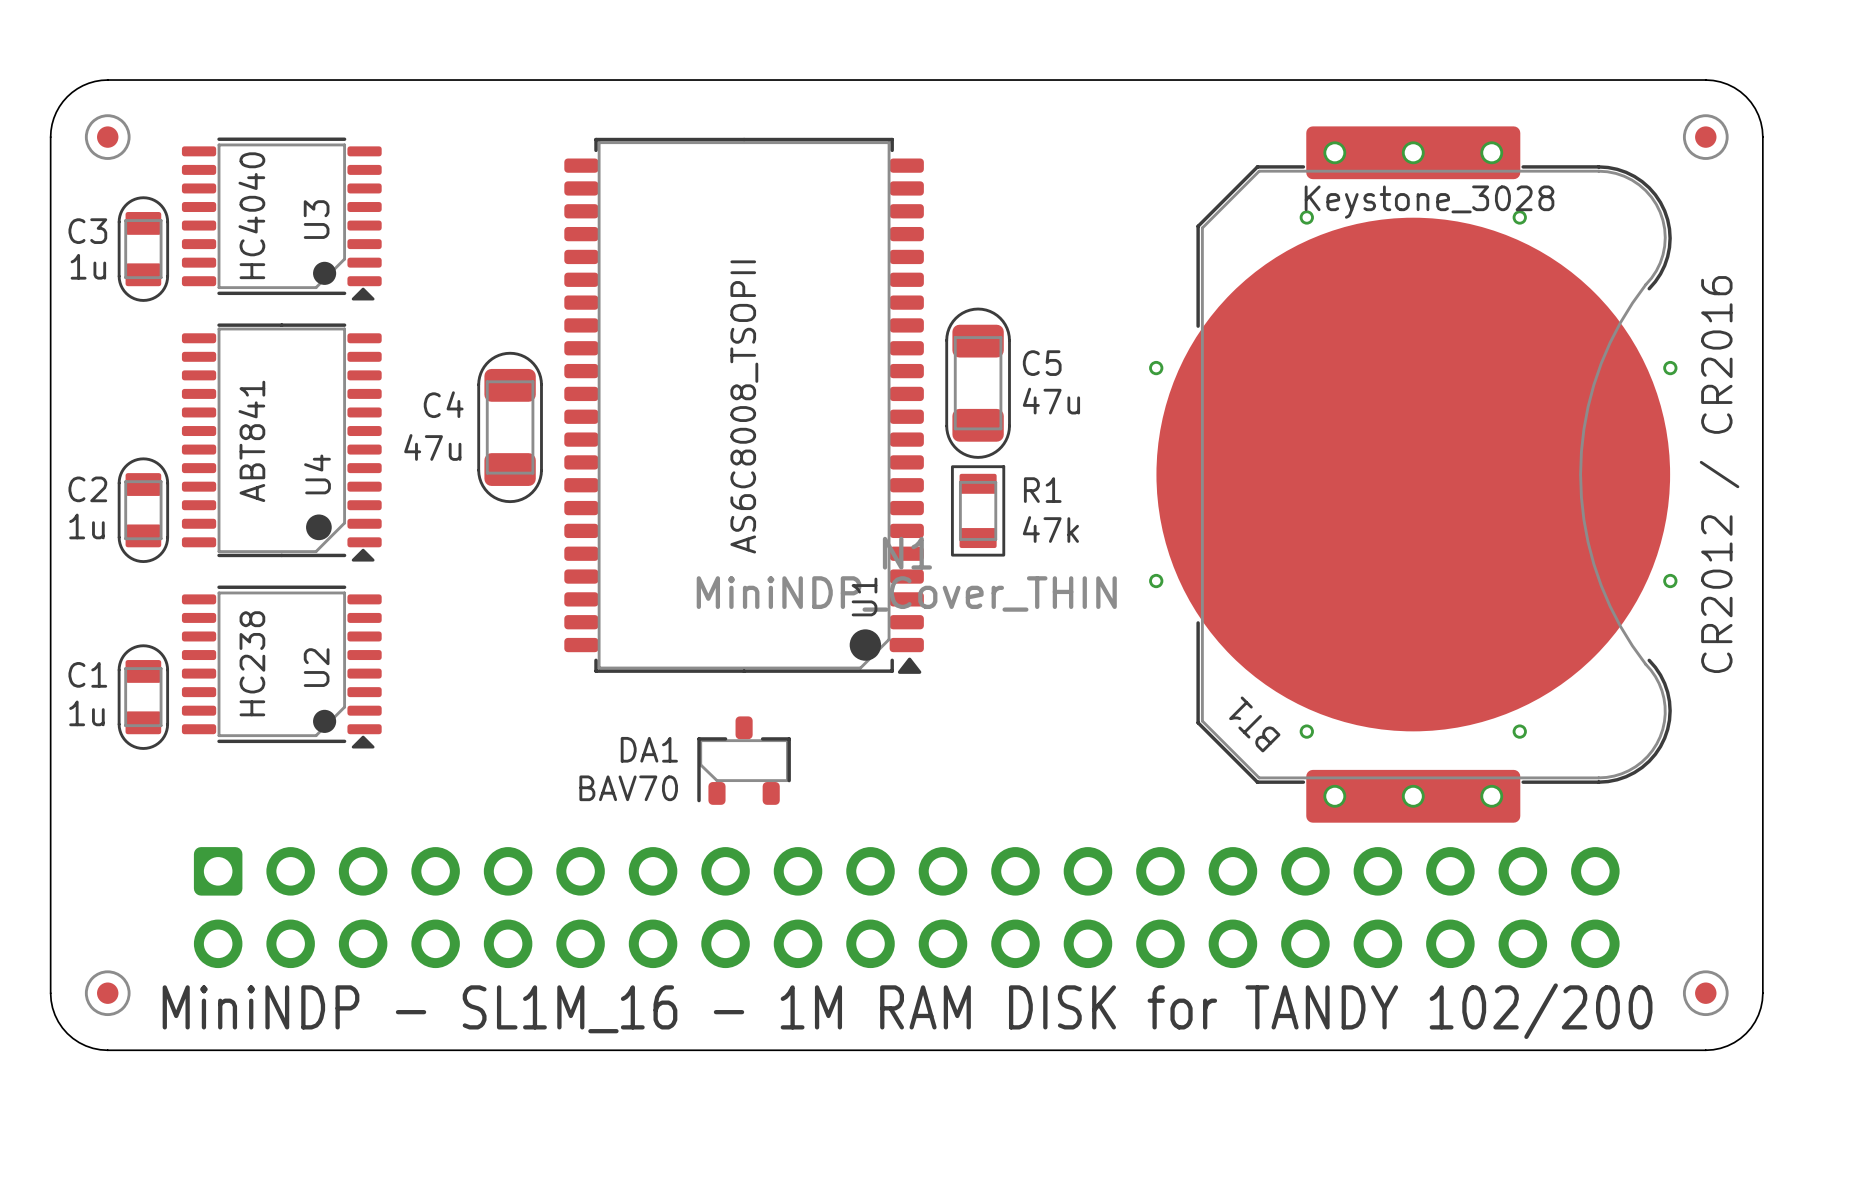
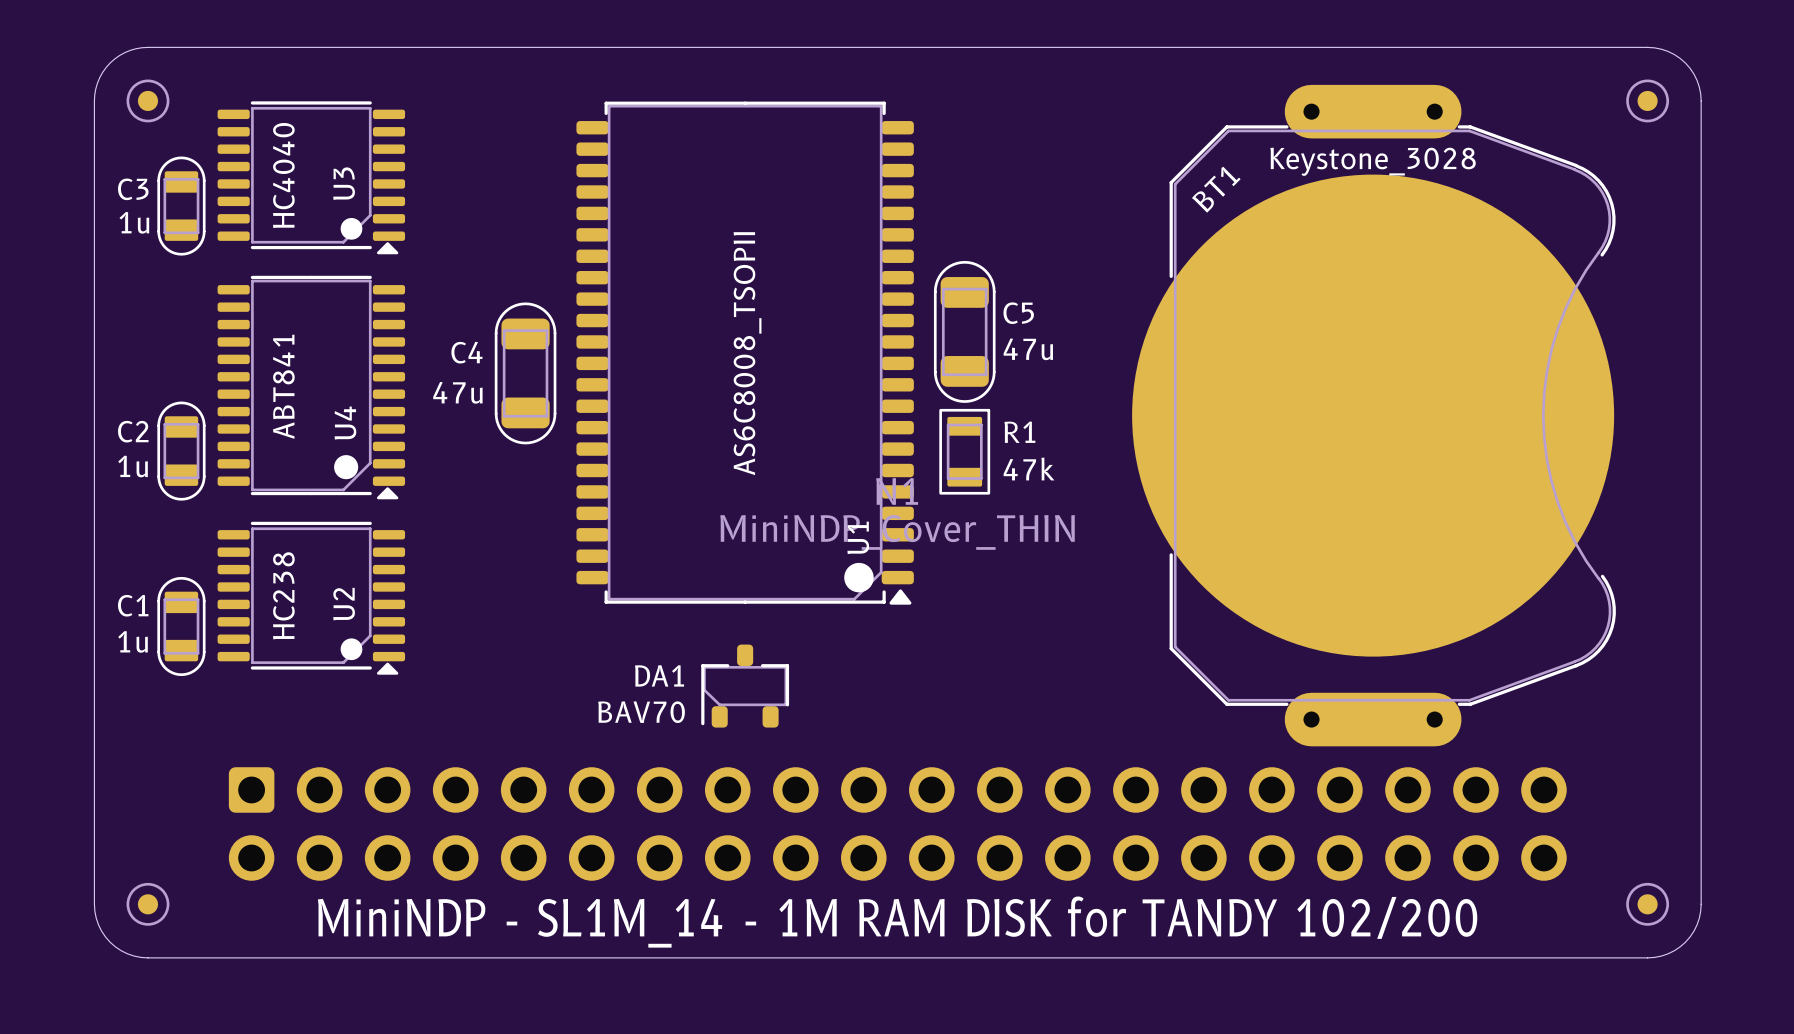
BT1 footprint: [1149, 126, 1678, 823] -> [1132, 84, 1616, 747]
part: none -> (1311, 111)
part: none -> (1434, 111)
text: CR2012 / CR2016 (1719, 474) -> none
BT1 name position: BT1 (1254, 724) -> BT1 (1216, 189)
part: none -> (1311, 719)
part: none -> (1434, 719)
text: MiniNDP - SL1M_16 - 1M RAM DISK for TANDY 102/200 (907, 1011) -> MiniNDP - SL1M_14 - 1M RAM DISK for TANDY 102/200 (897, 922)

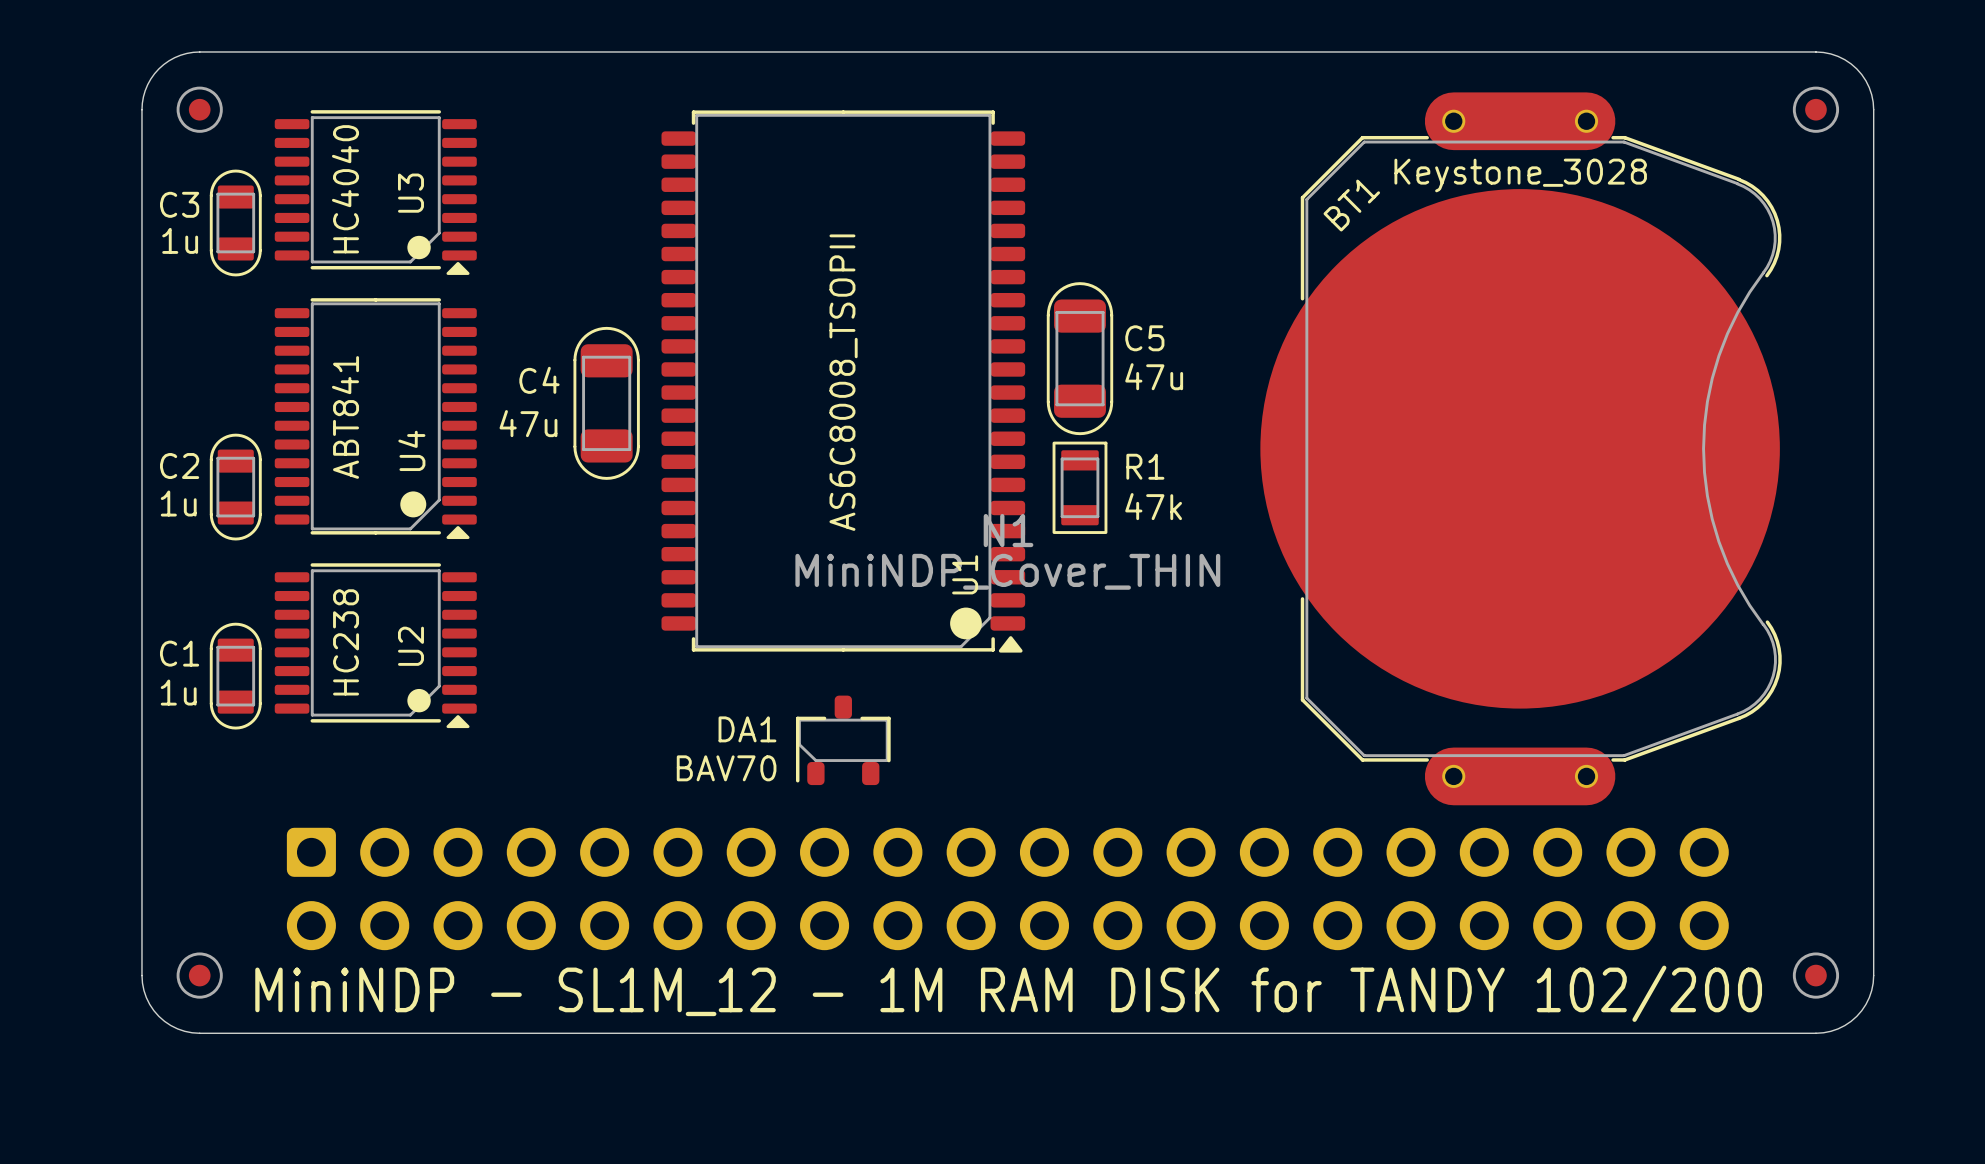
text: MiniNDP - SL1M_14 - 1M RAM DISK for TANDY 102/200 (897, 922) -> MiniNDP - SL1M_12 - 1M RAM DISK for TANDY 102/200 (1008, 993)

